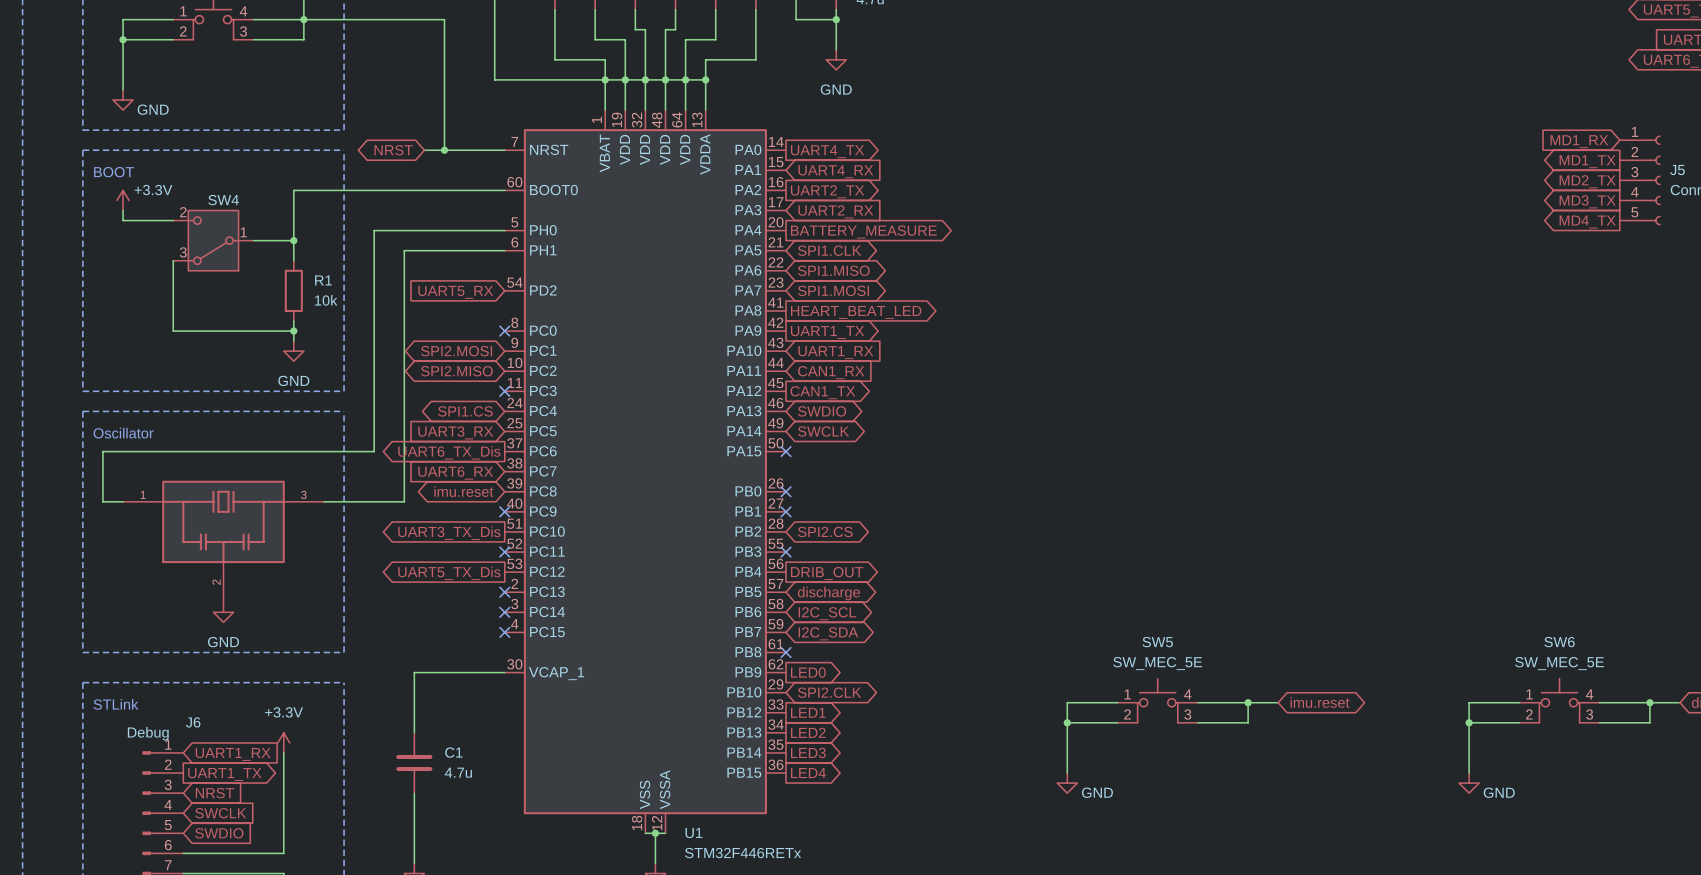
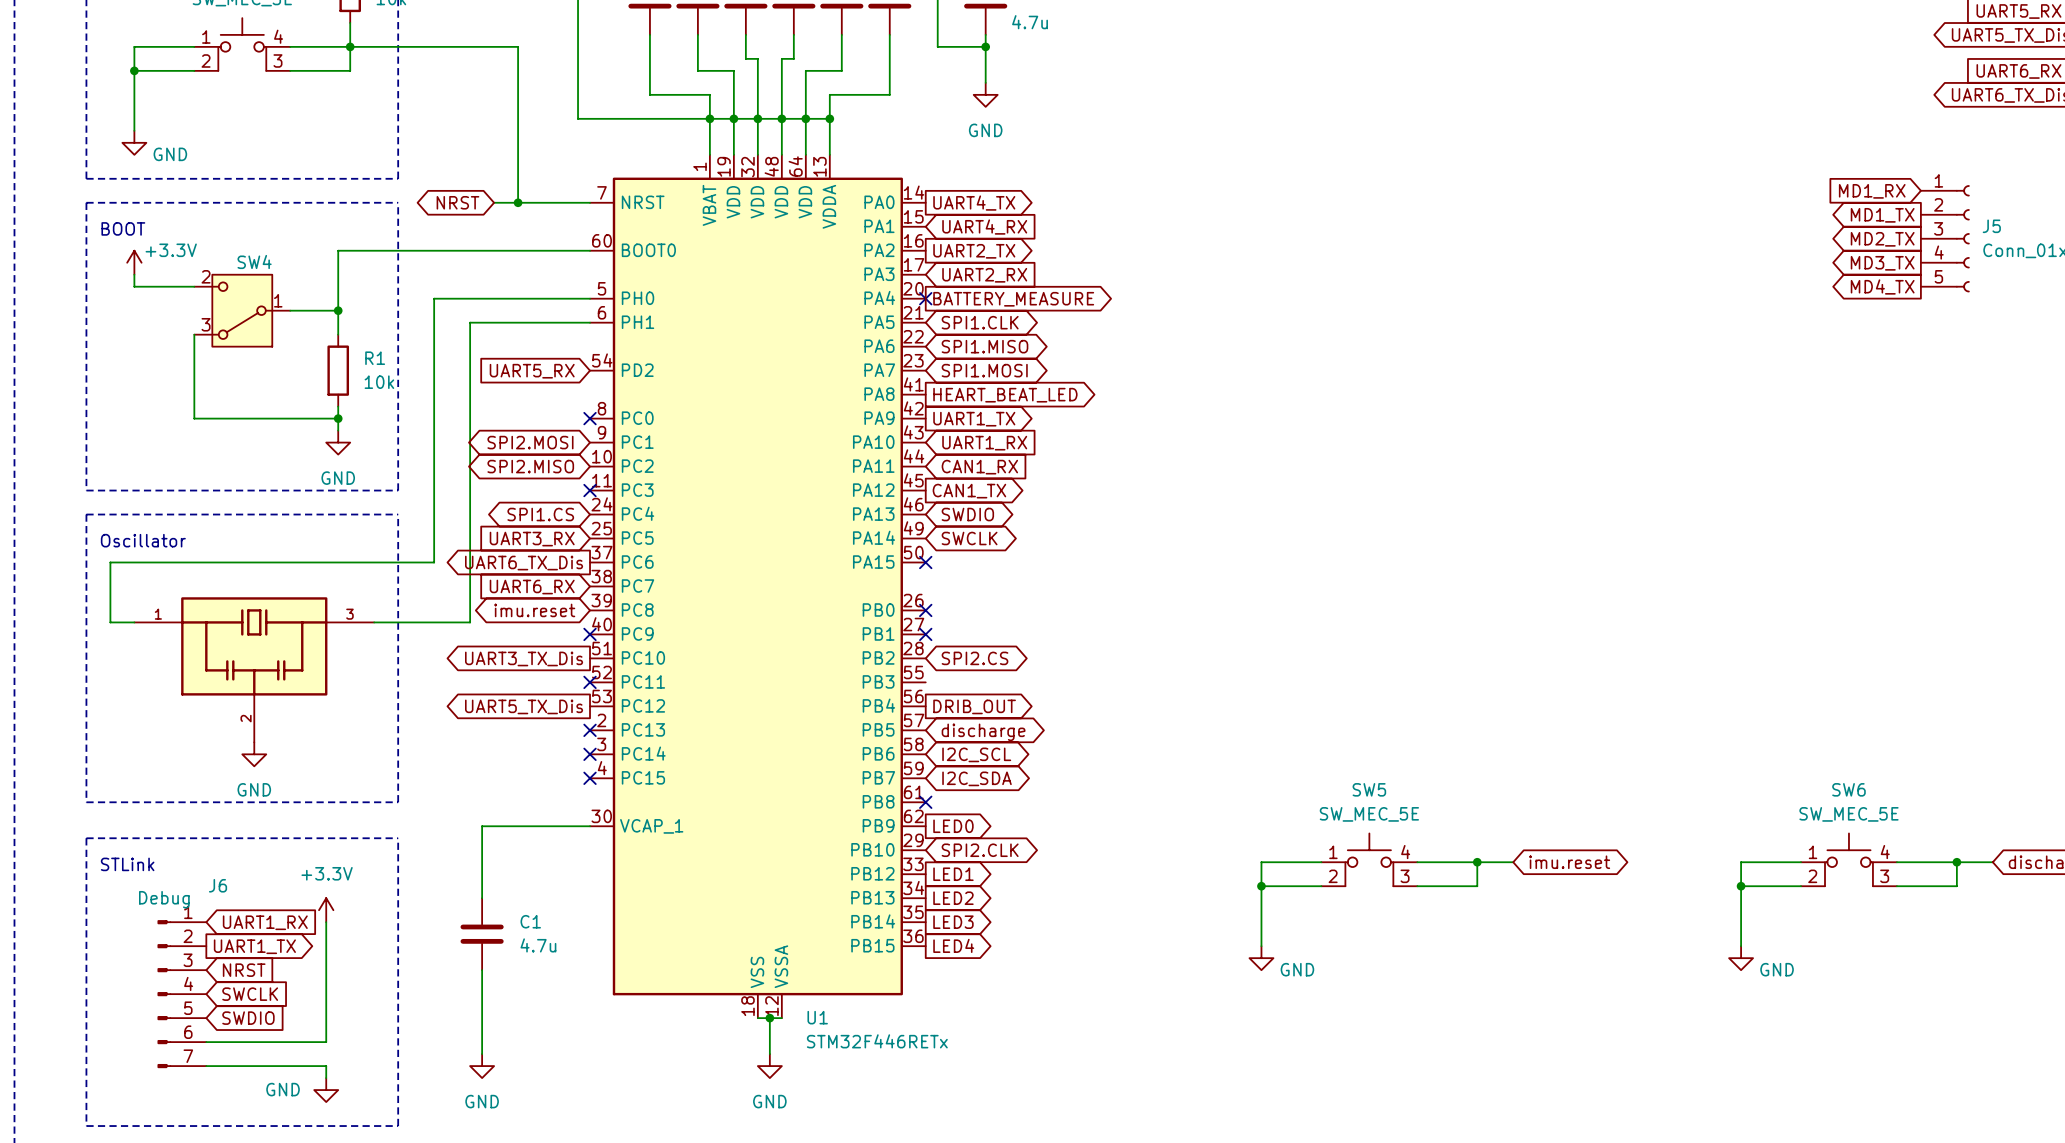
no-connect mark: none -> (925, 298)
no-connect mark: (786, 552) -> none

